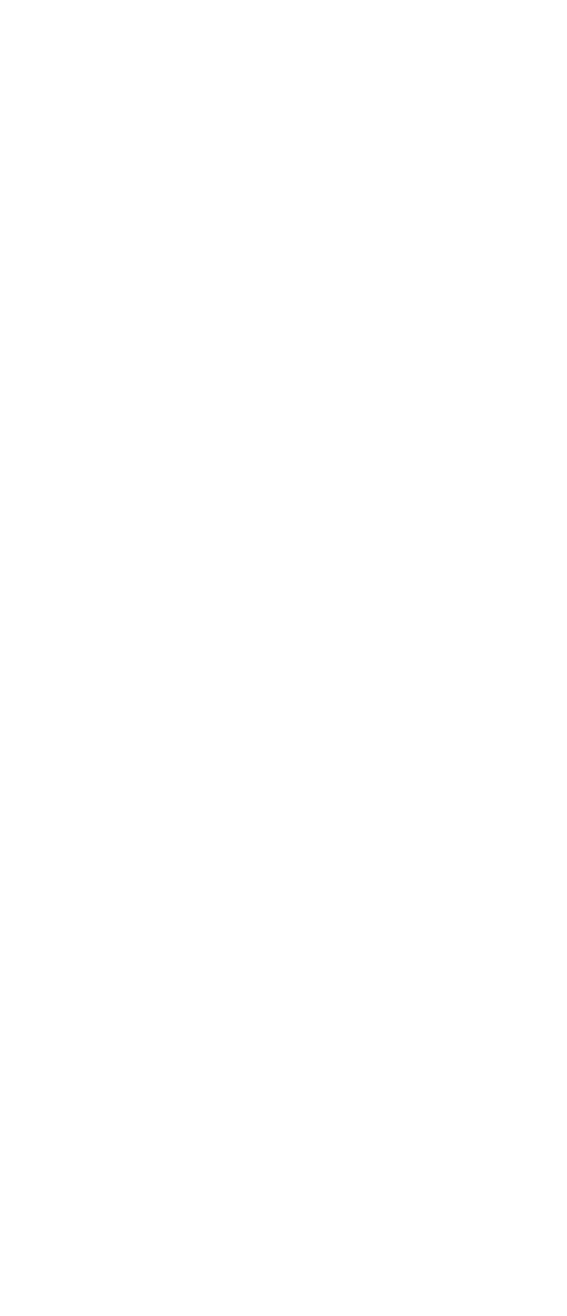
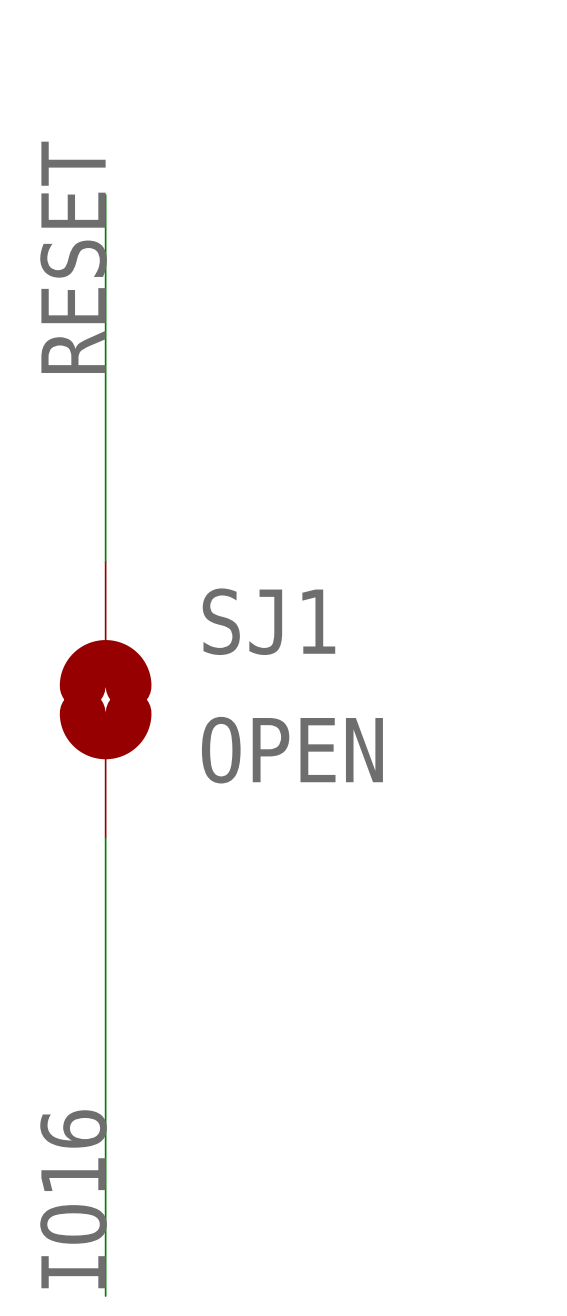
wire: none -> (105, 195) (105, 562)
label: none -> RESET (73, 257)
SJ1: none -> OPEN (105, 699)
wire: none -> (105, 837) (105, 1296)
label: none -> IO16 (73, 1199)

